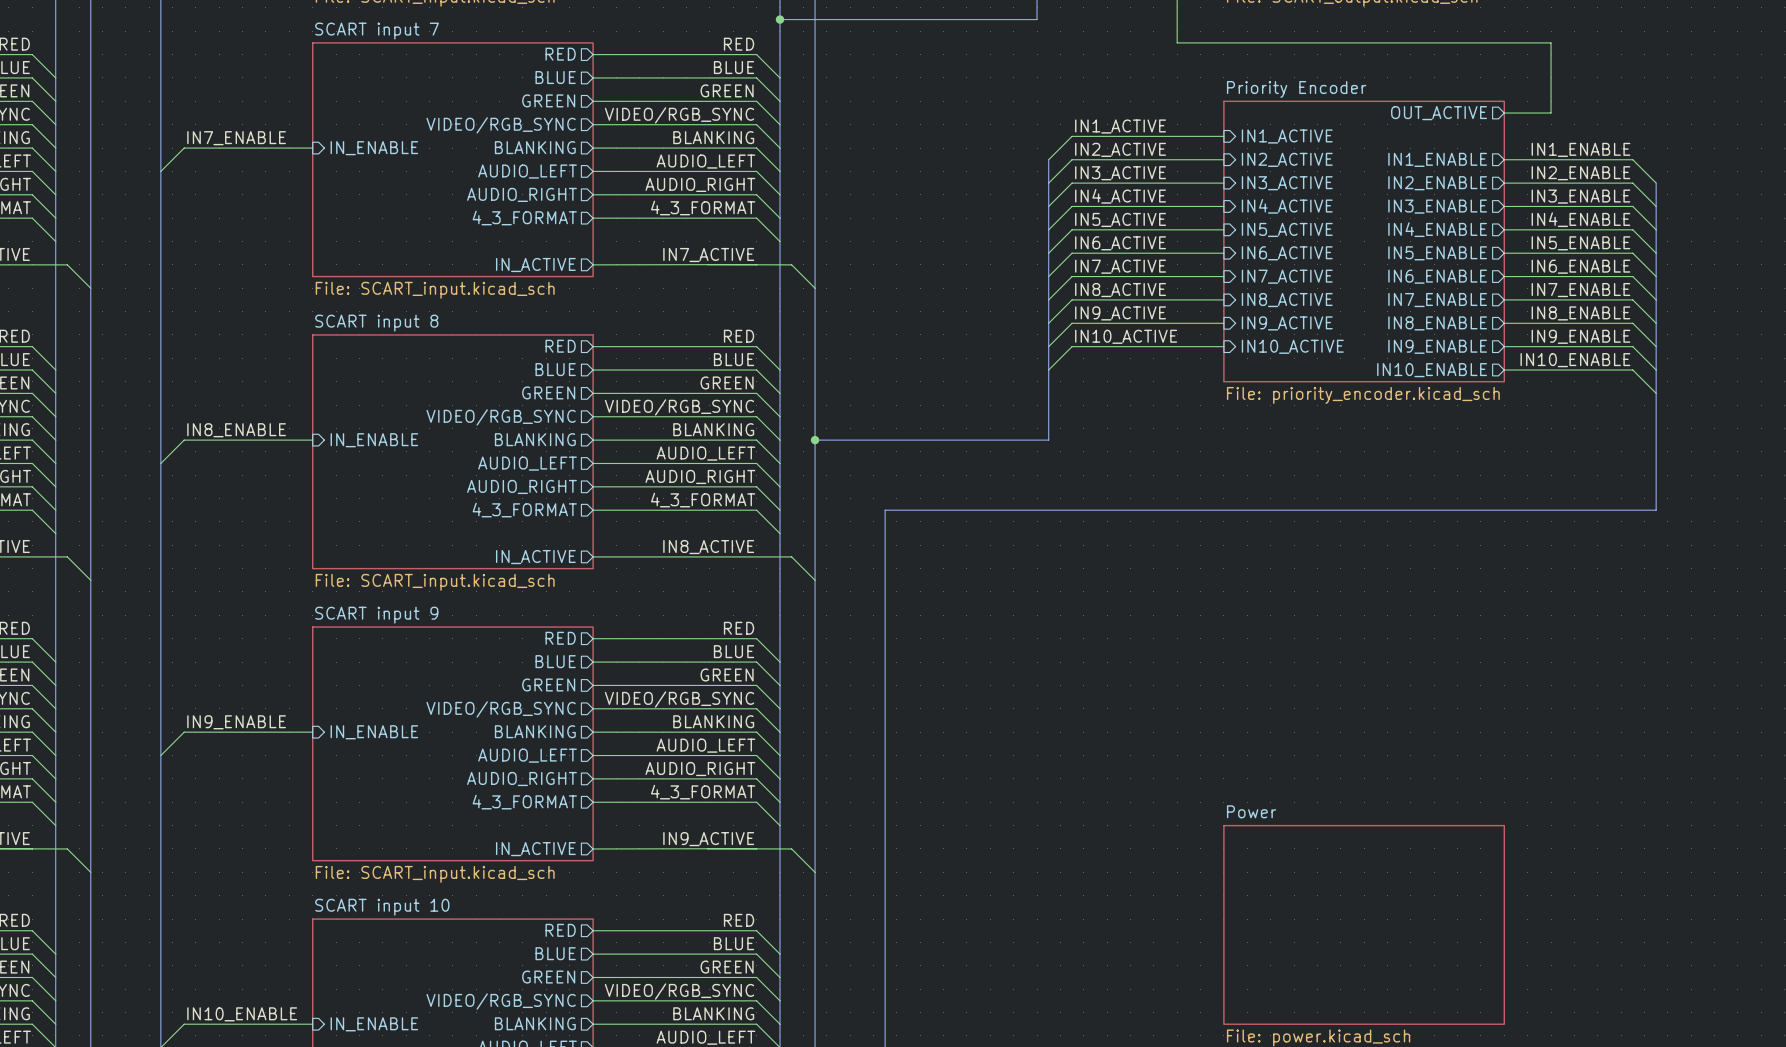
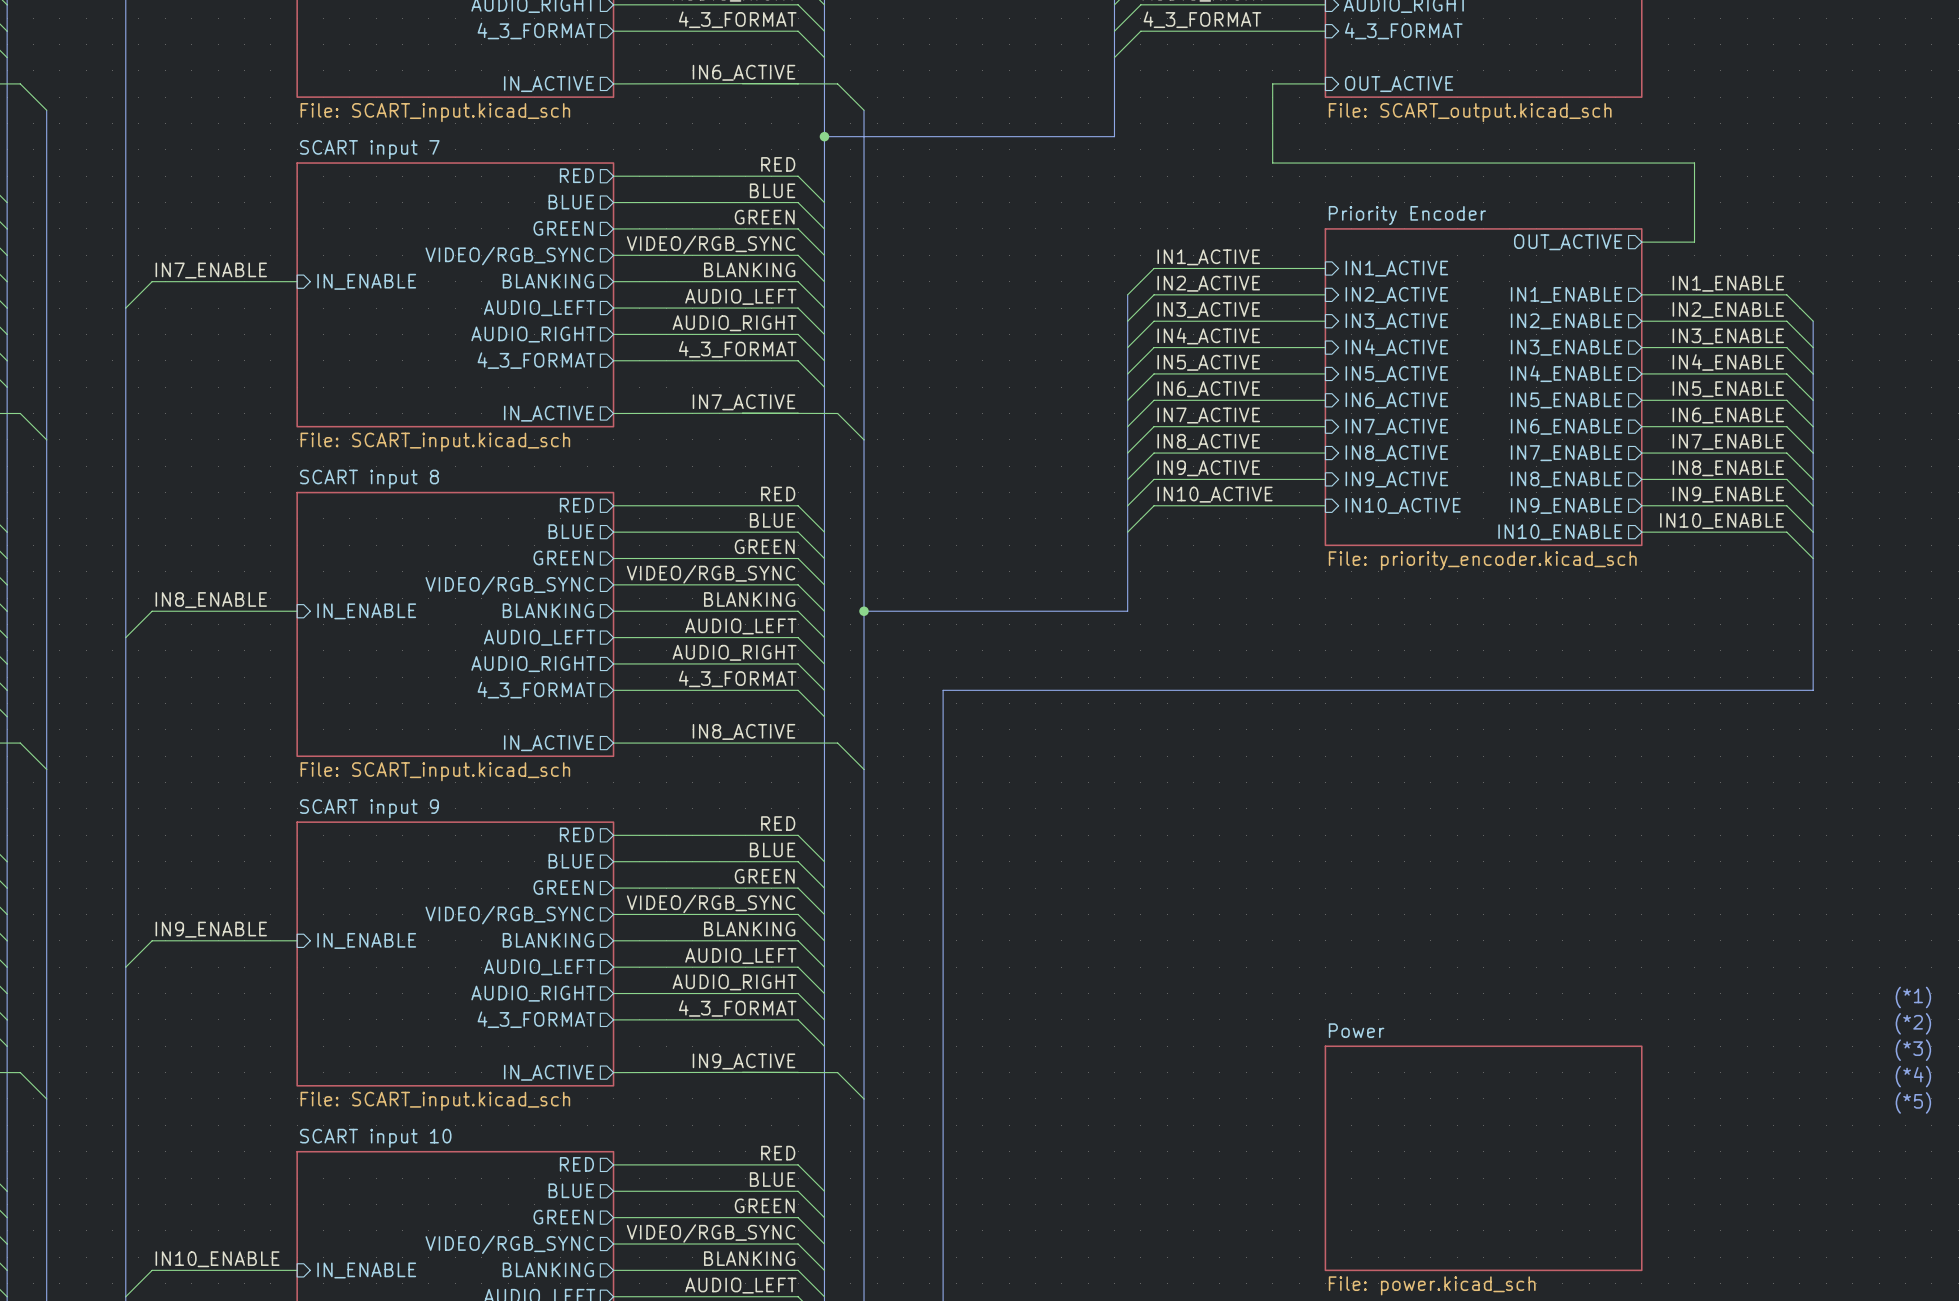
text: none -> (*1) (1913, 997)
text: none -> (*2) (1913, 1023)
text: none -> (*3) (1913, 1050)
text: none -> (*4) (1913, 1076)
text: none -> (*5) (1913, 1102)

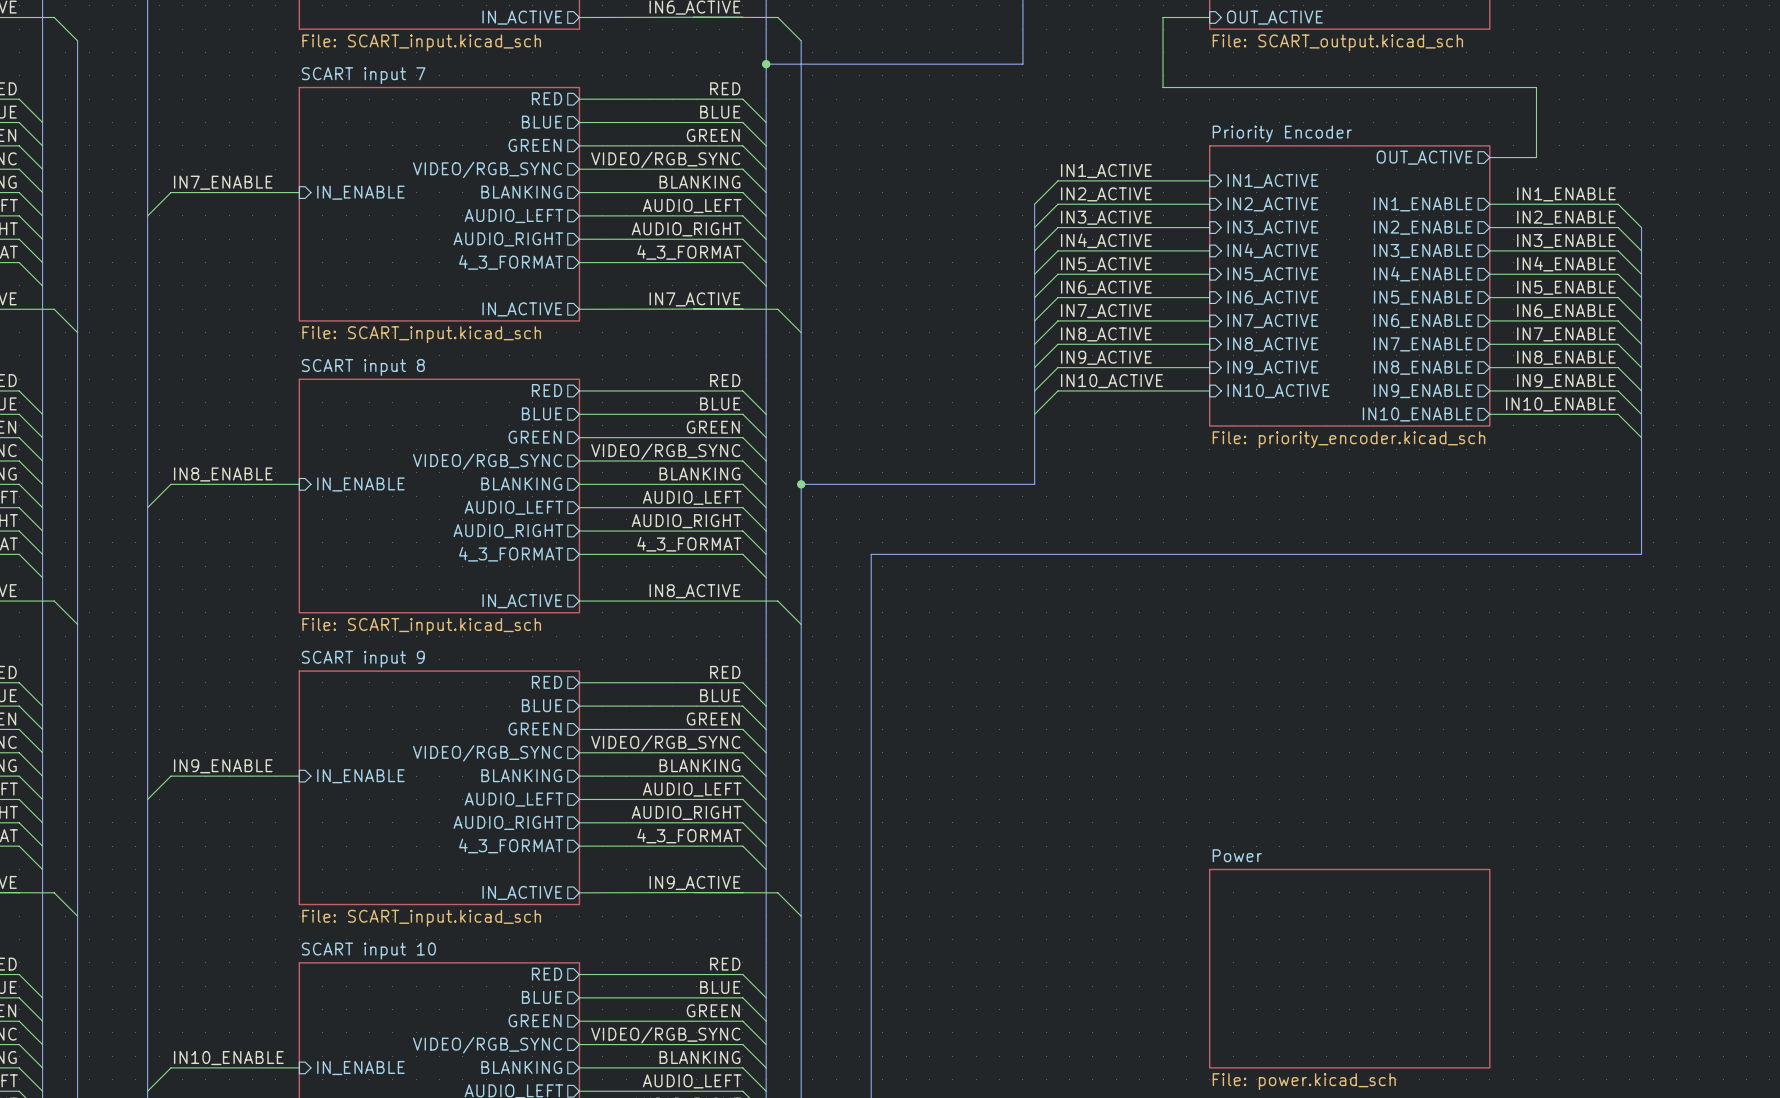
text: (*1) (1913, 997) -> none
text: (*2) (1913, 1023) -> none
text: (*3) (1913, 1050) -> none
text: (*4) (1913, 1076) -> none
text: (*5) (1913, 1102) -> none

